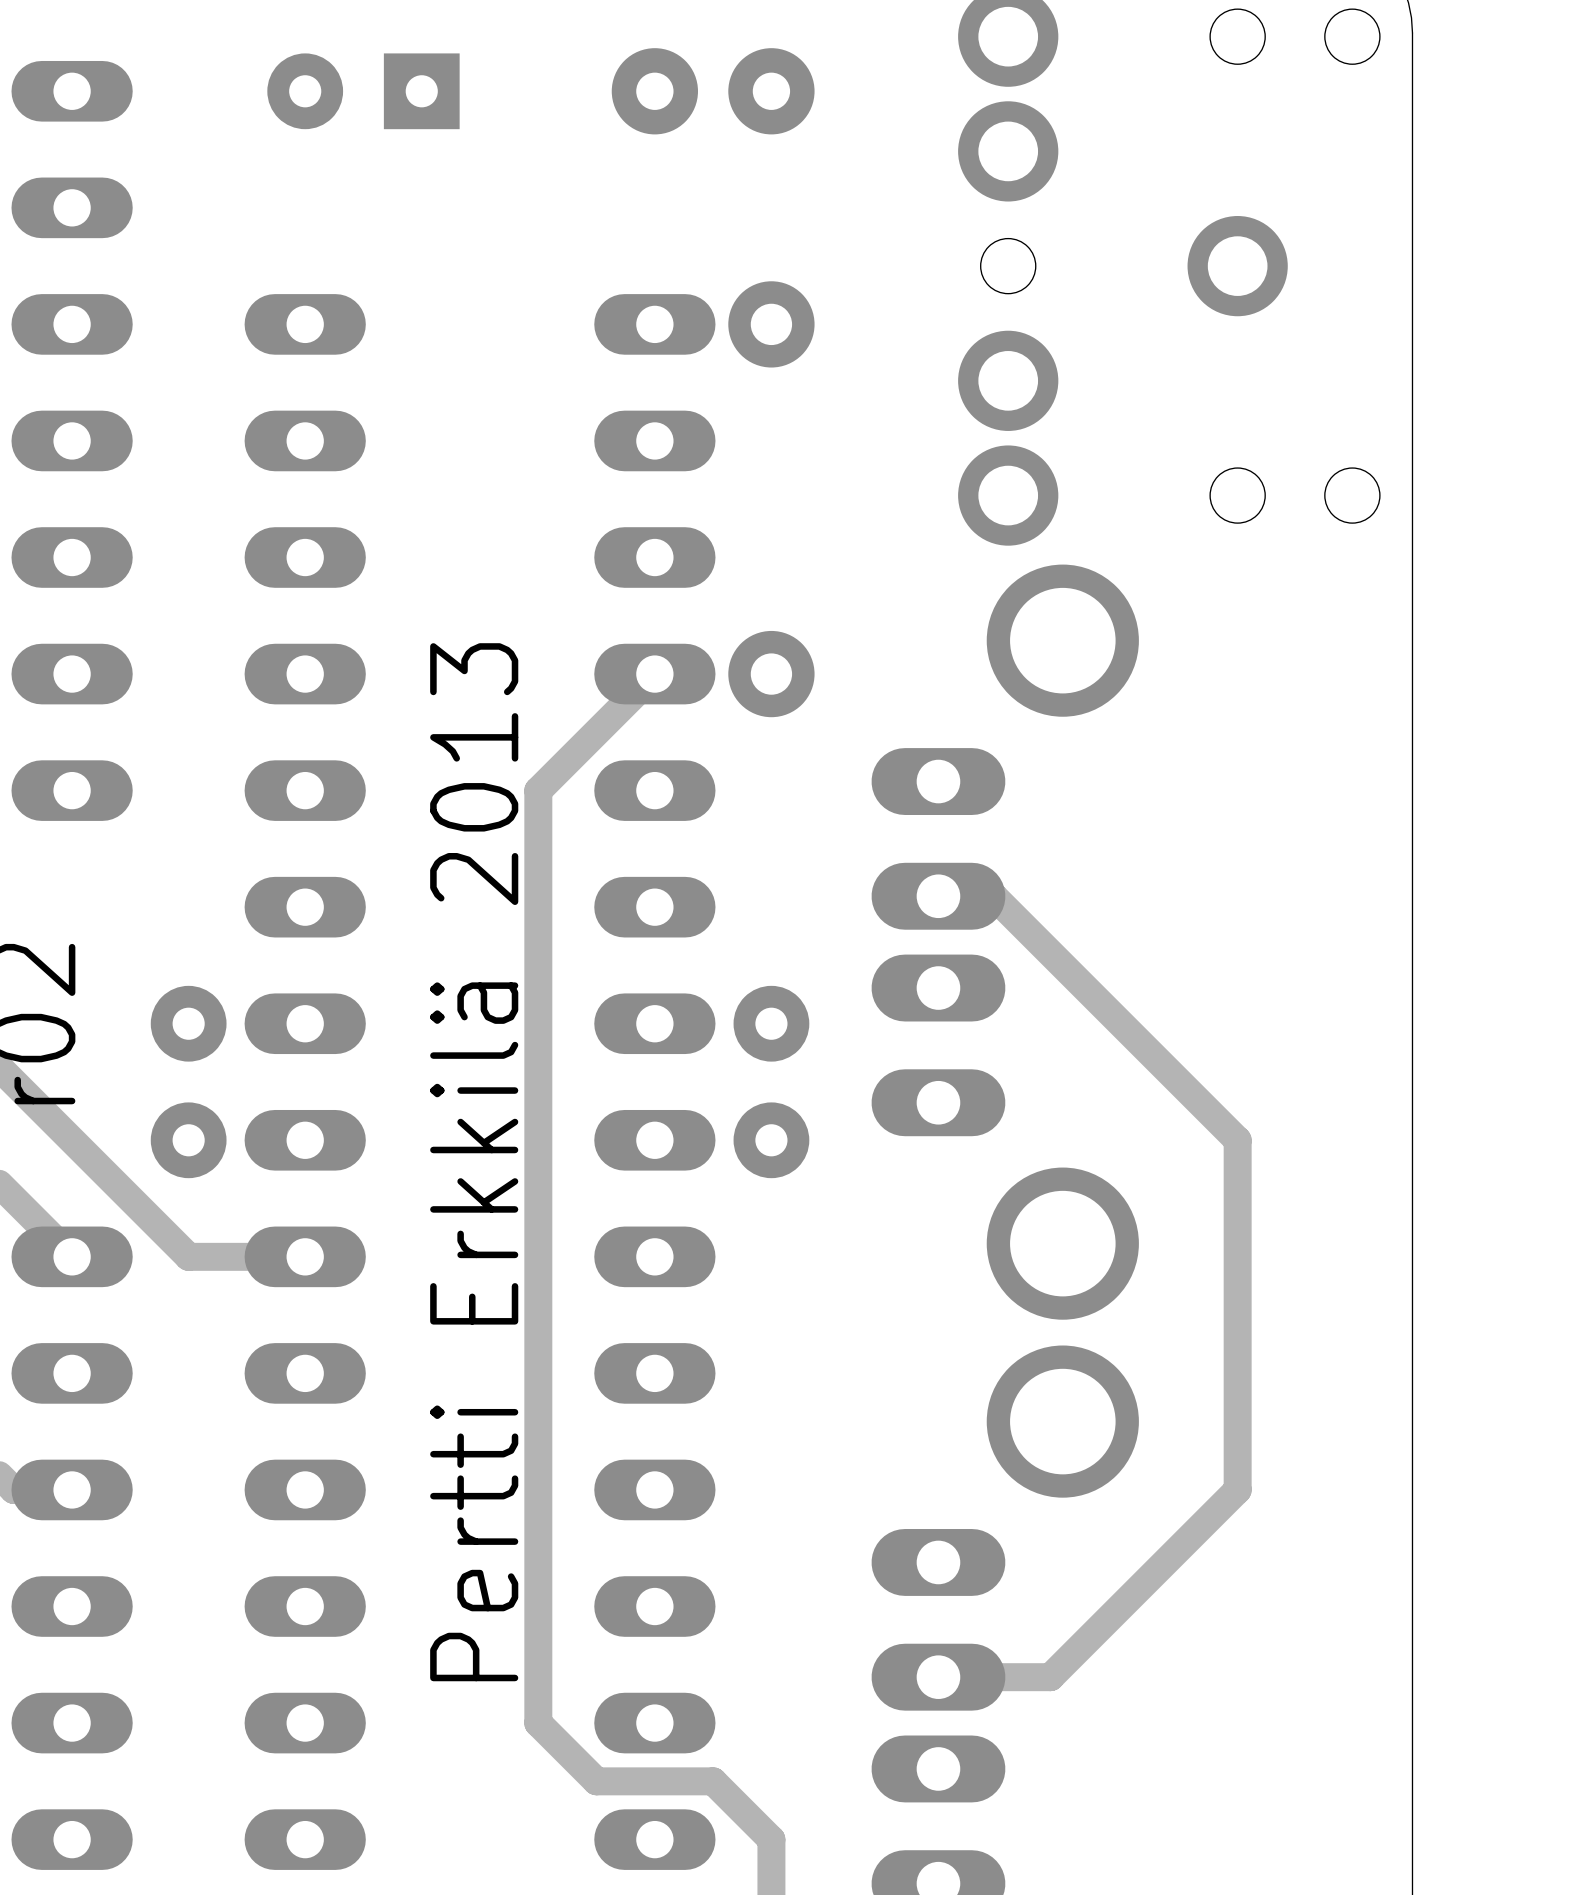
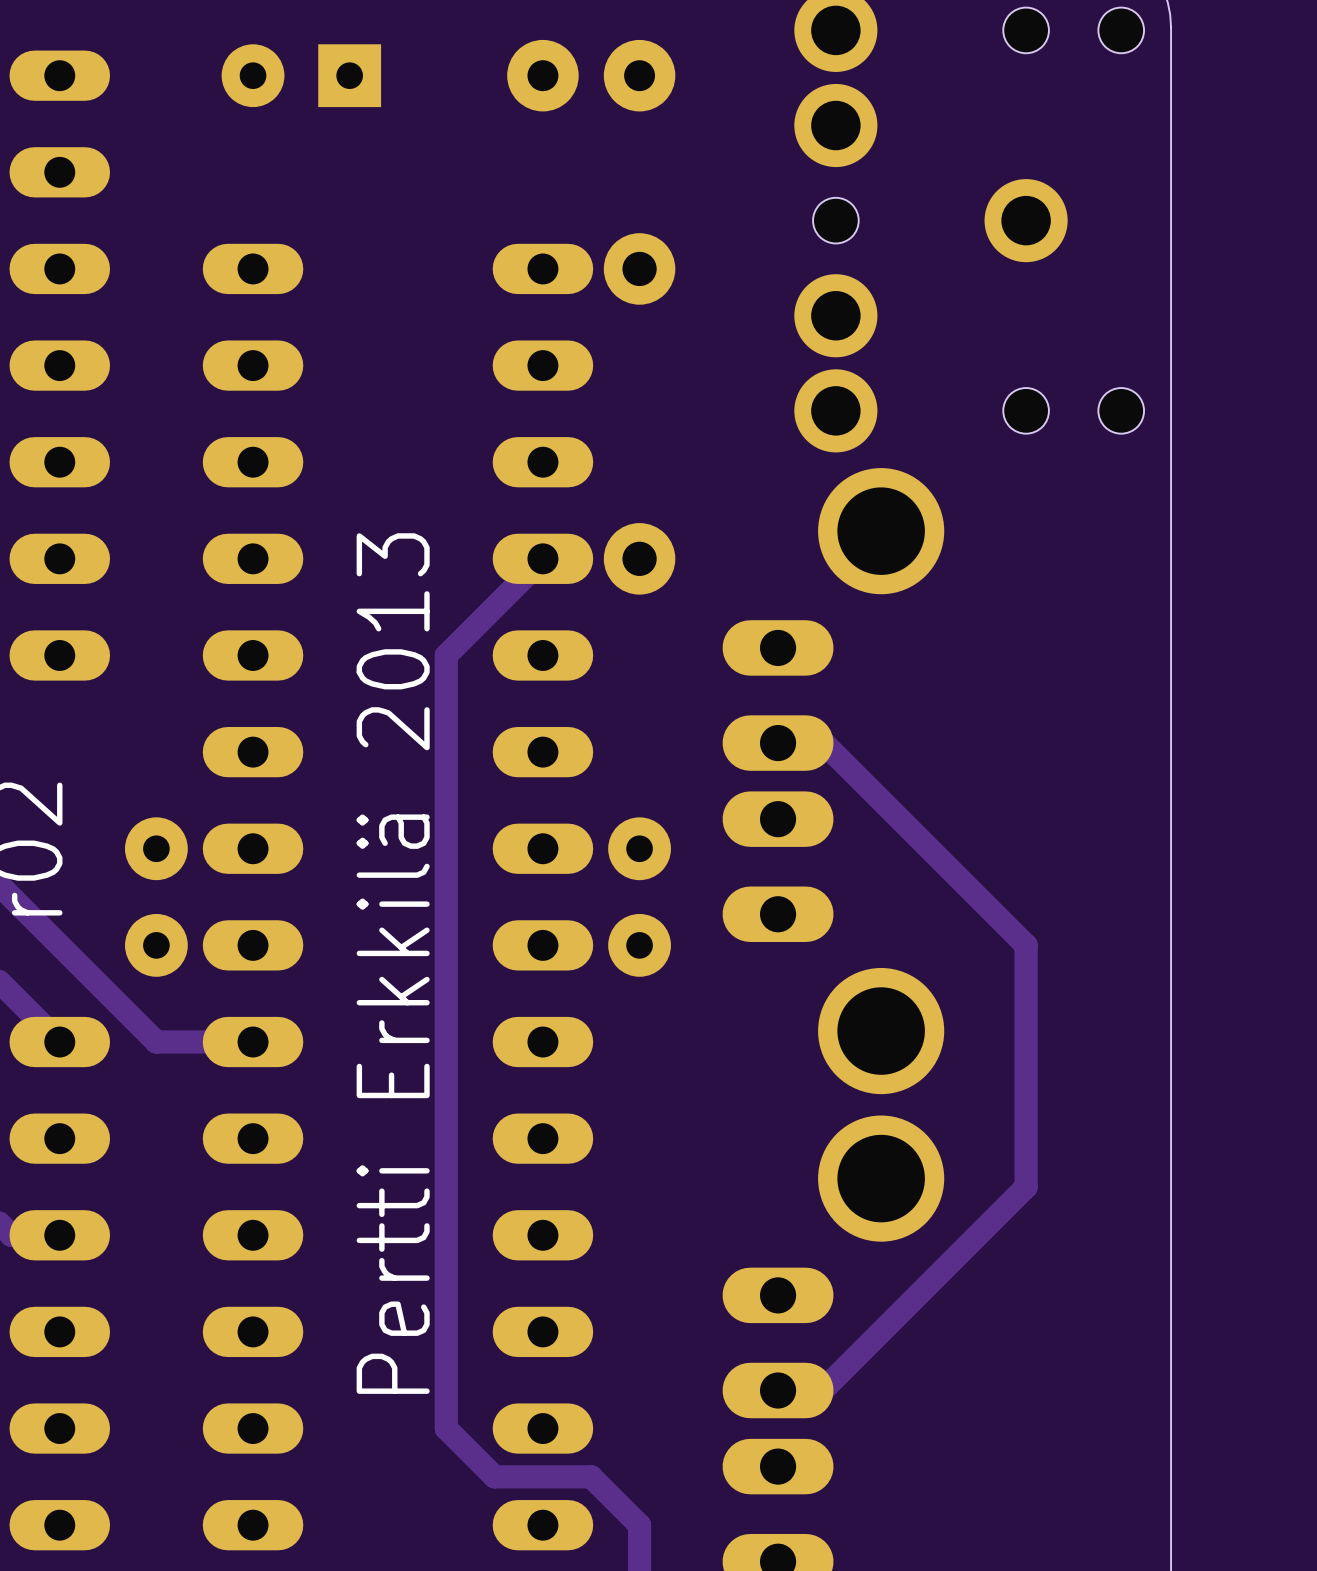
track: (1237, 1431) (1237, 1489) (1050, 1677) (992, 1677) -> (1026, 1186) (822, 1390)

